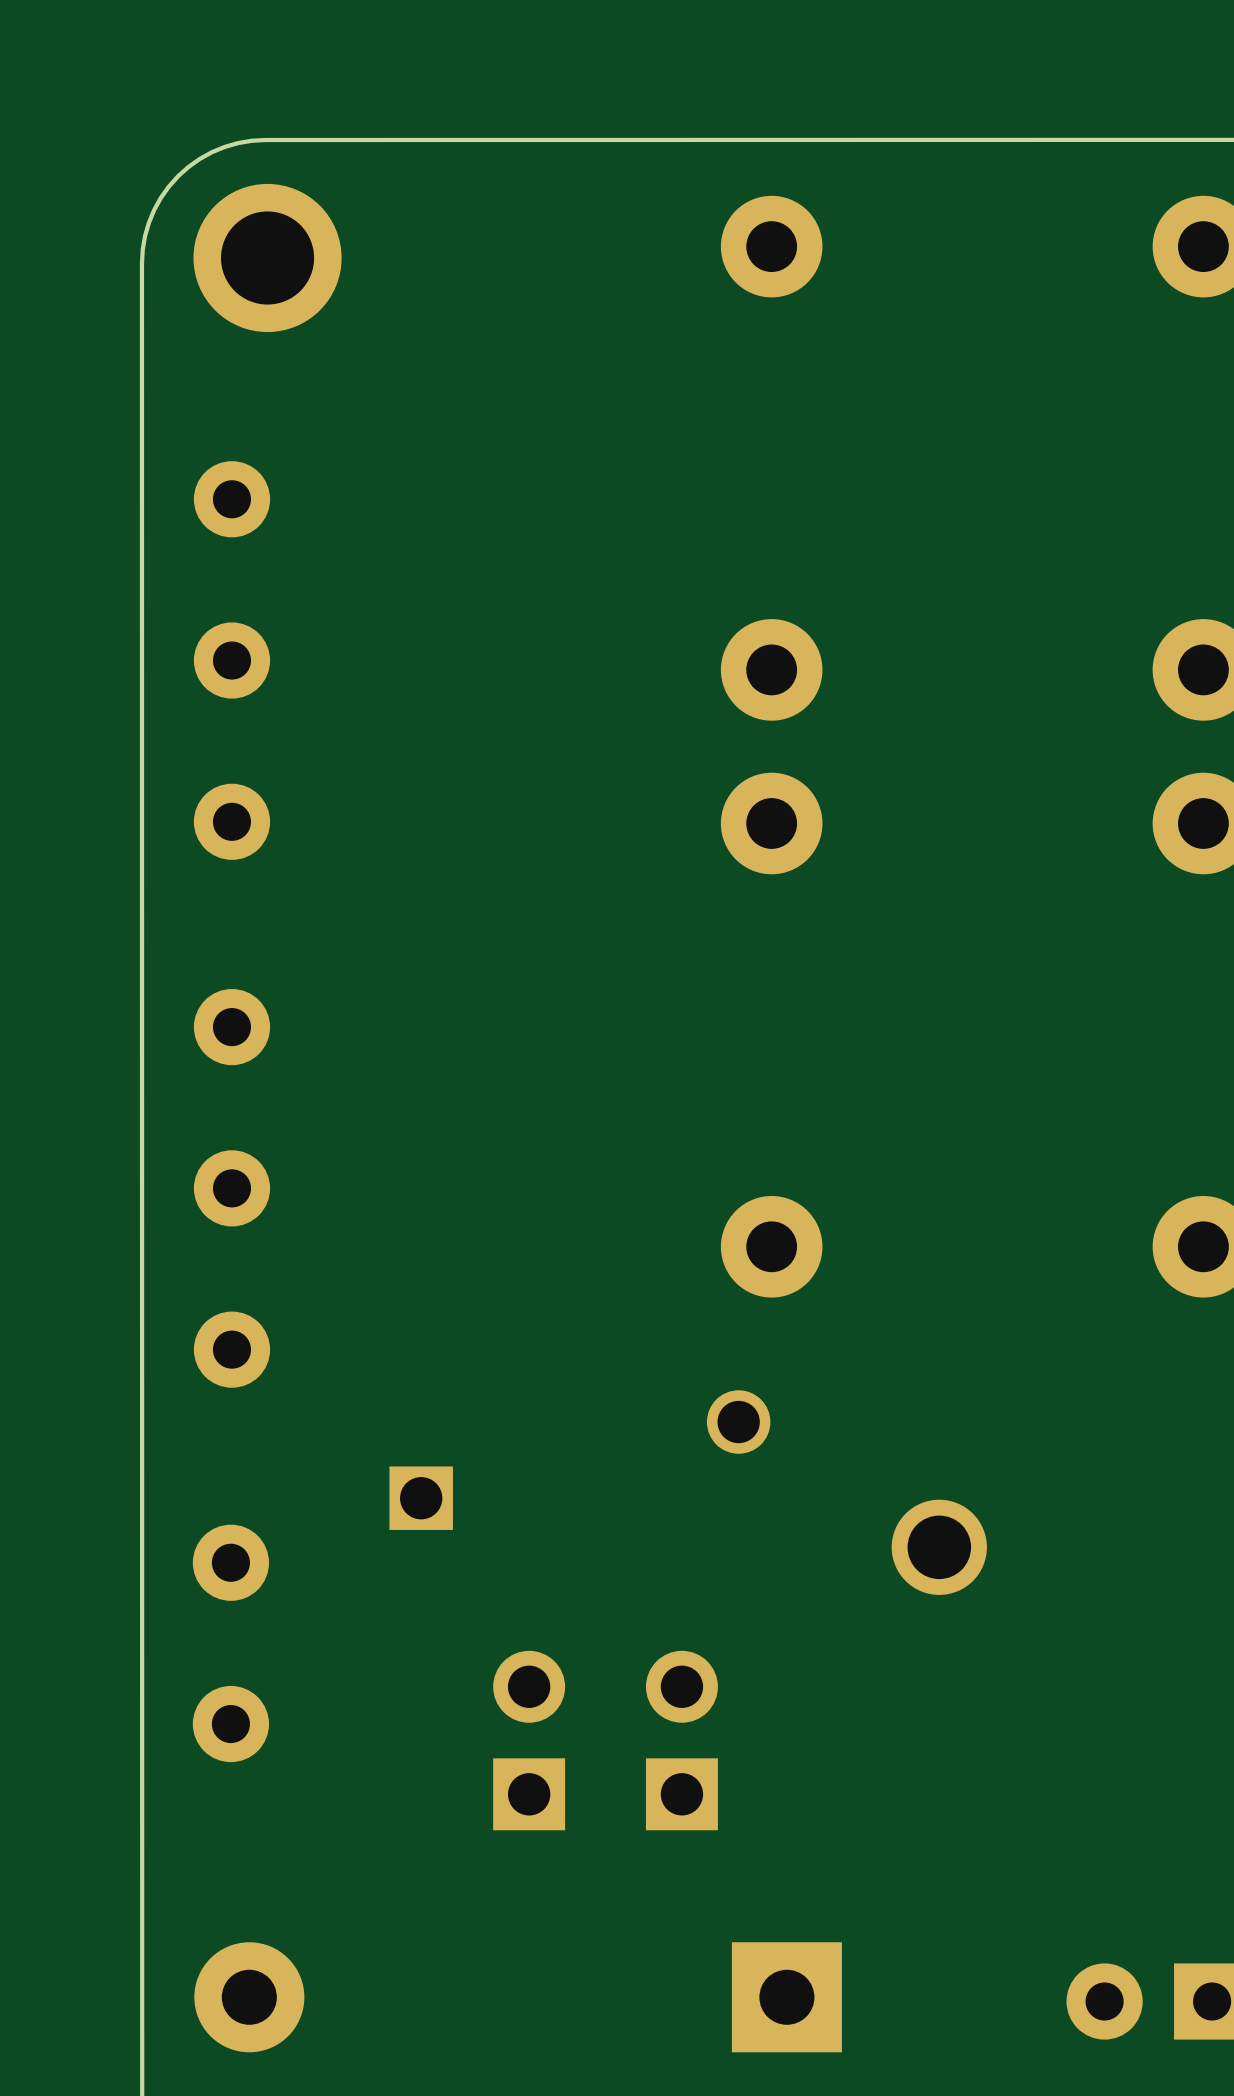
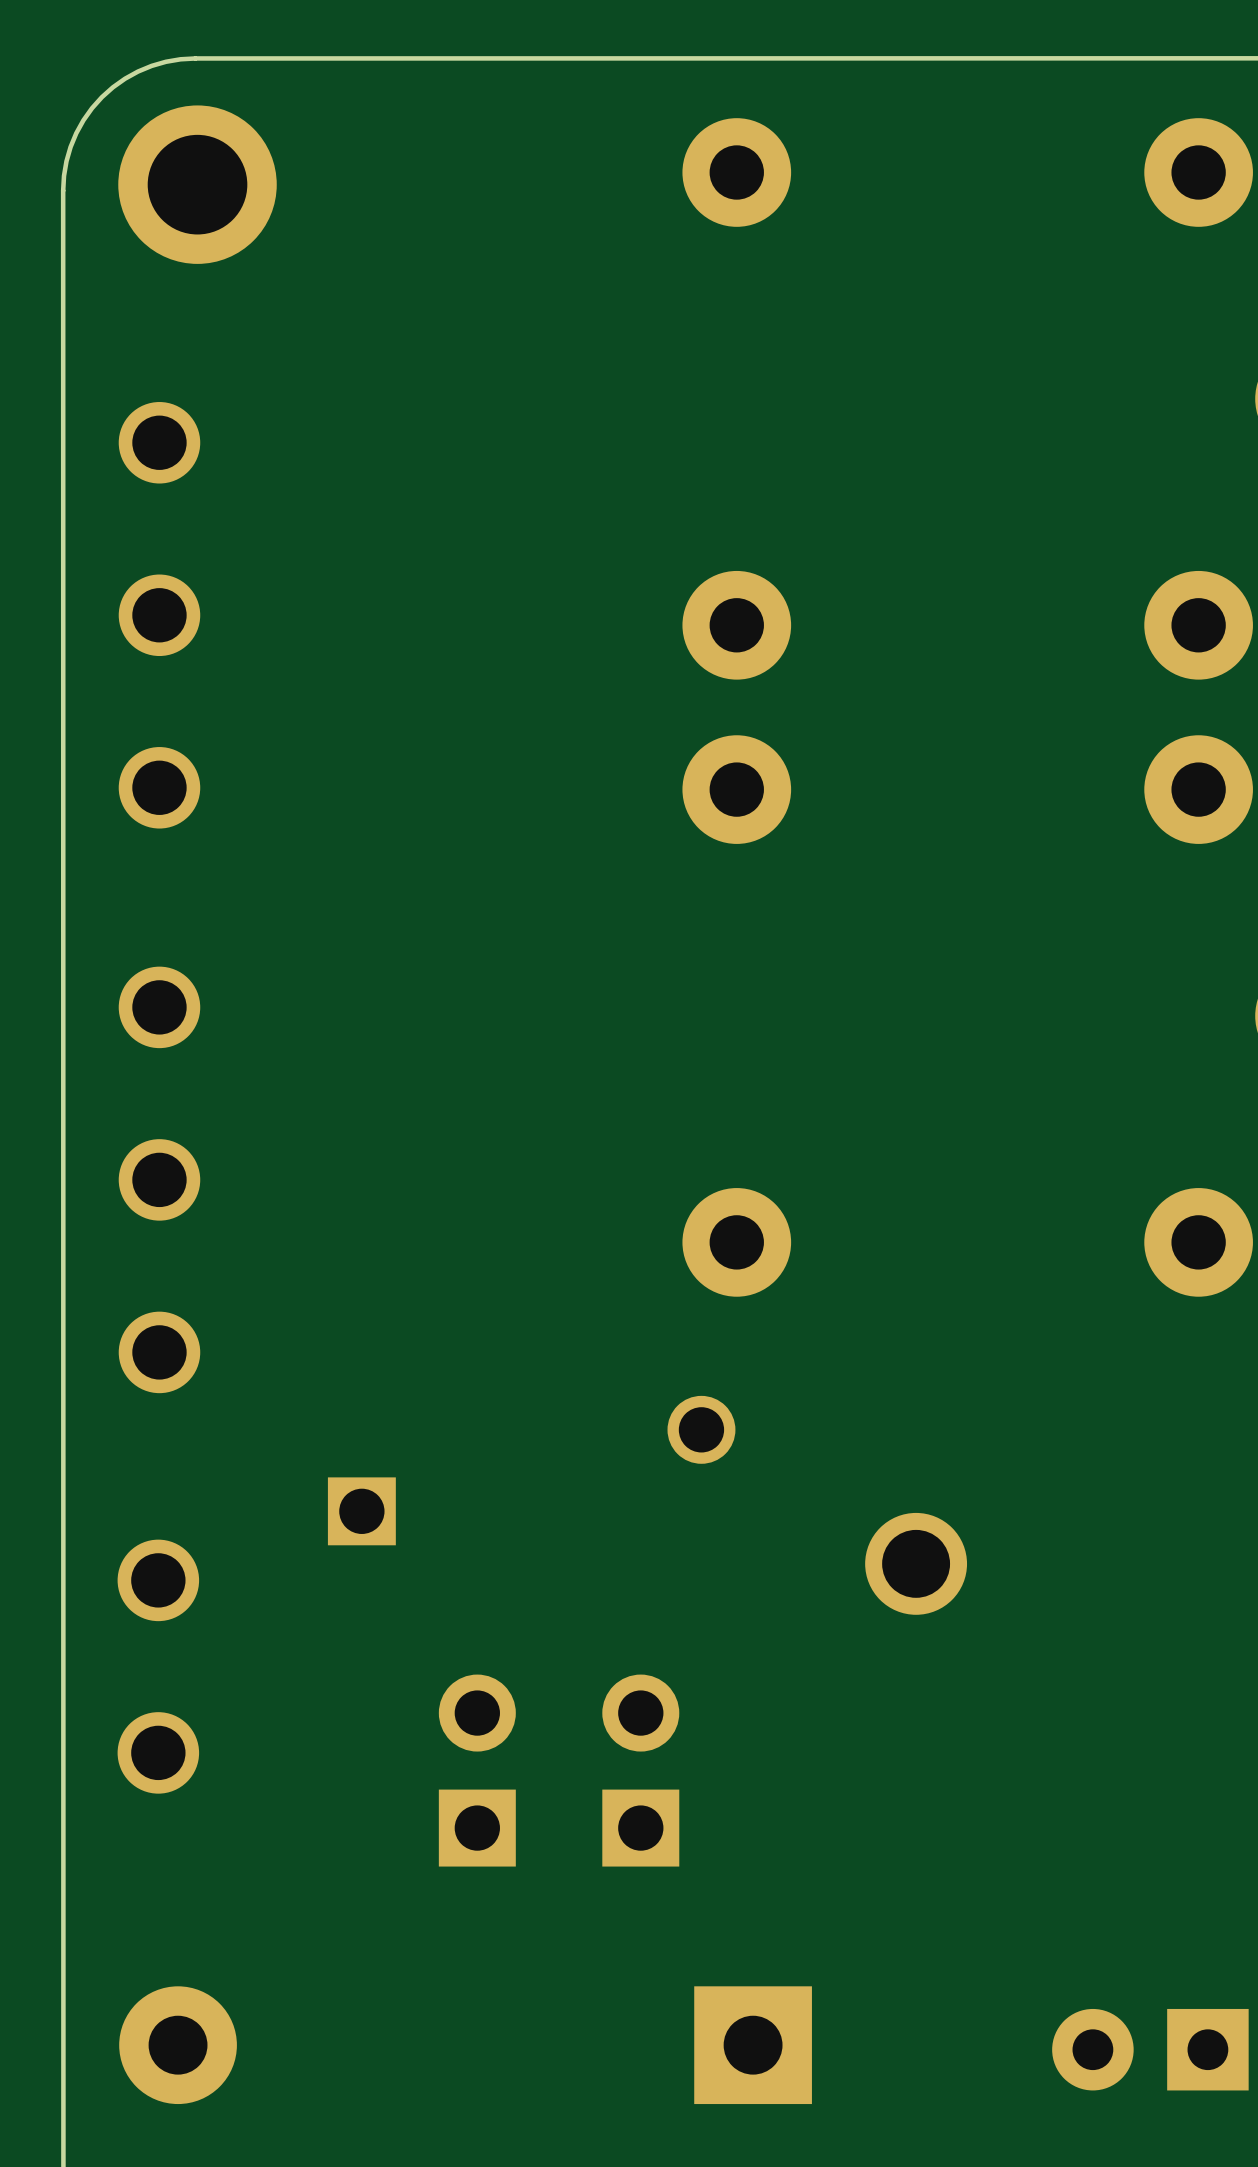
part footprint: [193, 461, 271, 860] -> [118, 402, 201, 829]
part footprint: [193, 989, 271, 1388] -> [118, 966, 201, 1394]
part footprint: [192, 1524, 270, 1763] -> [117, 1539, 200, 1794]

